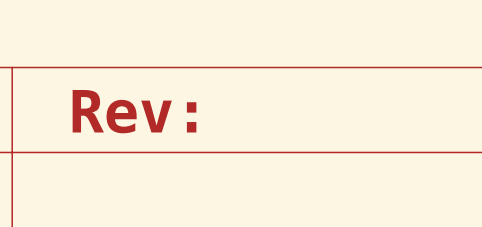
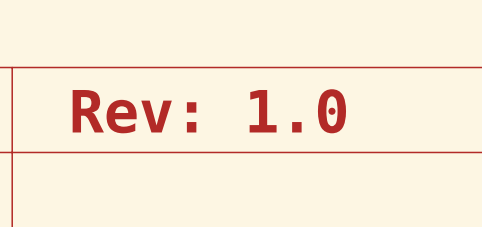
title block: Rev: (134, 111) -> Rev: 1.0 (209, 111)

